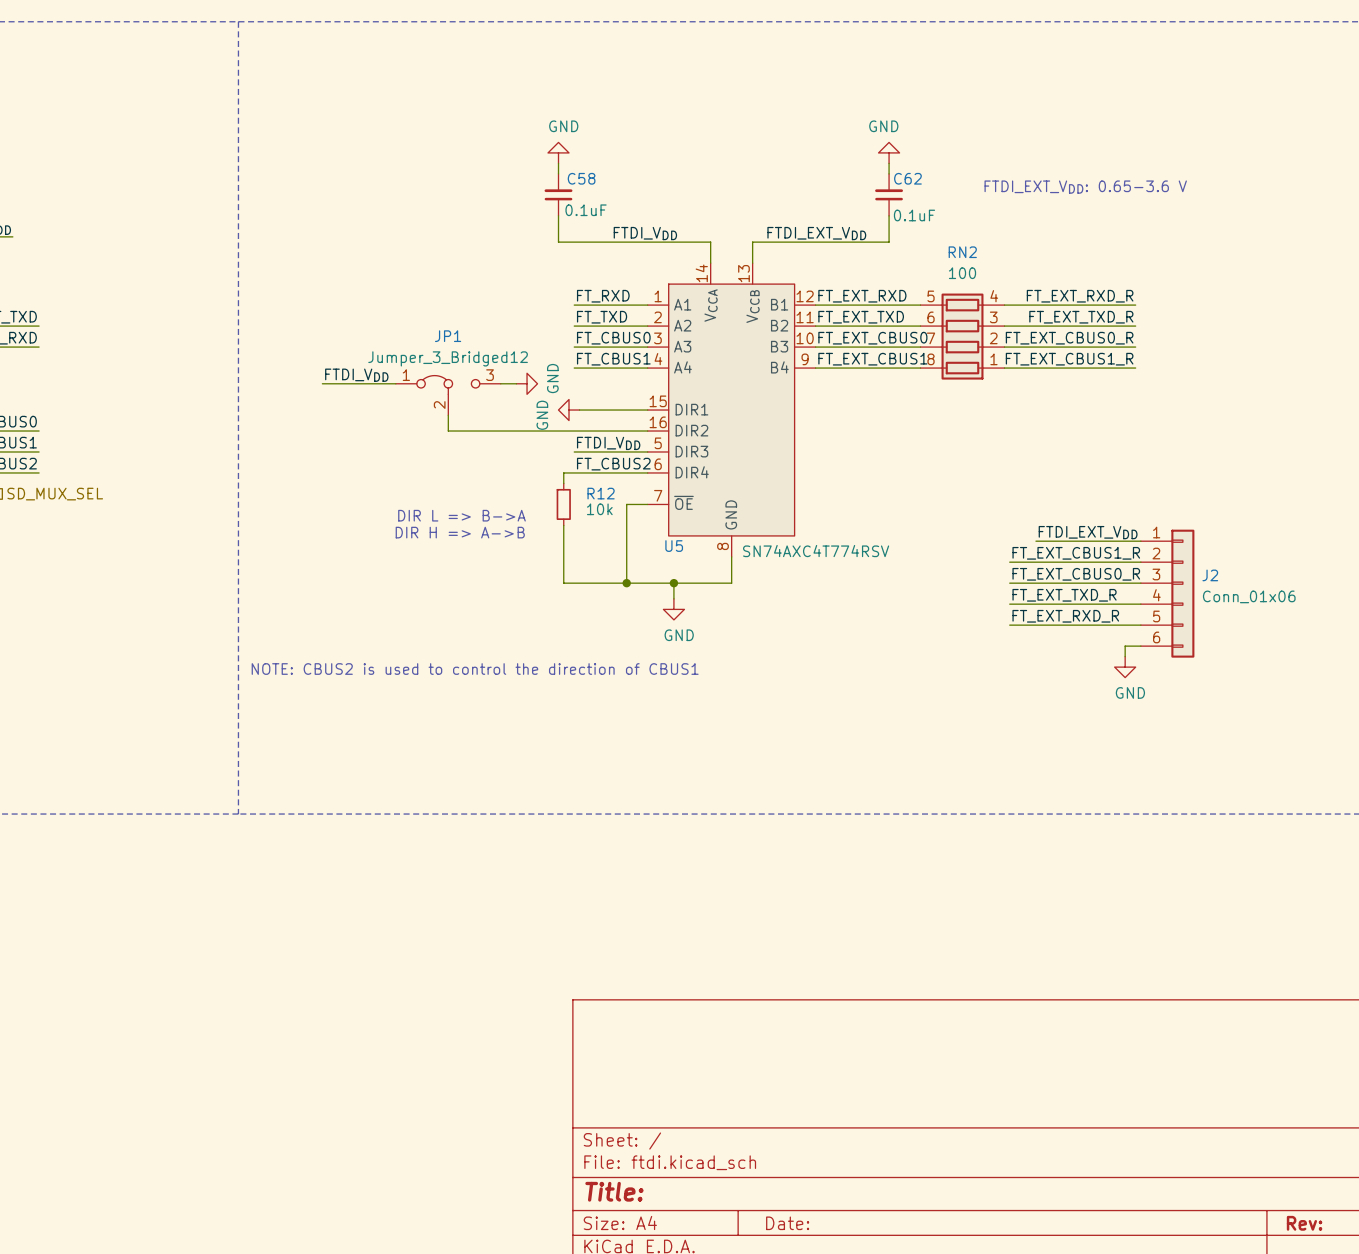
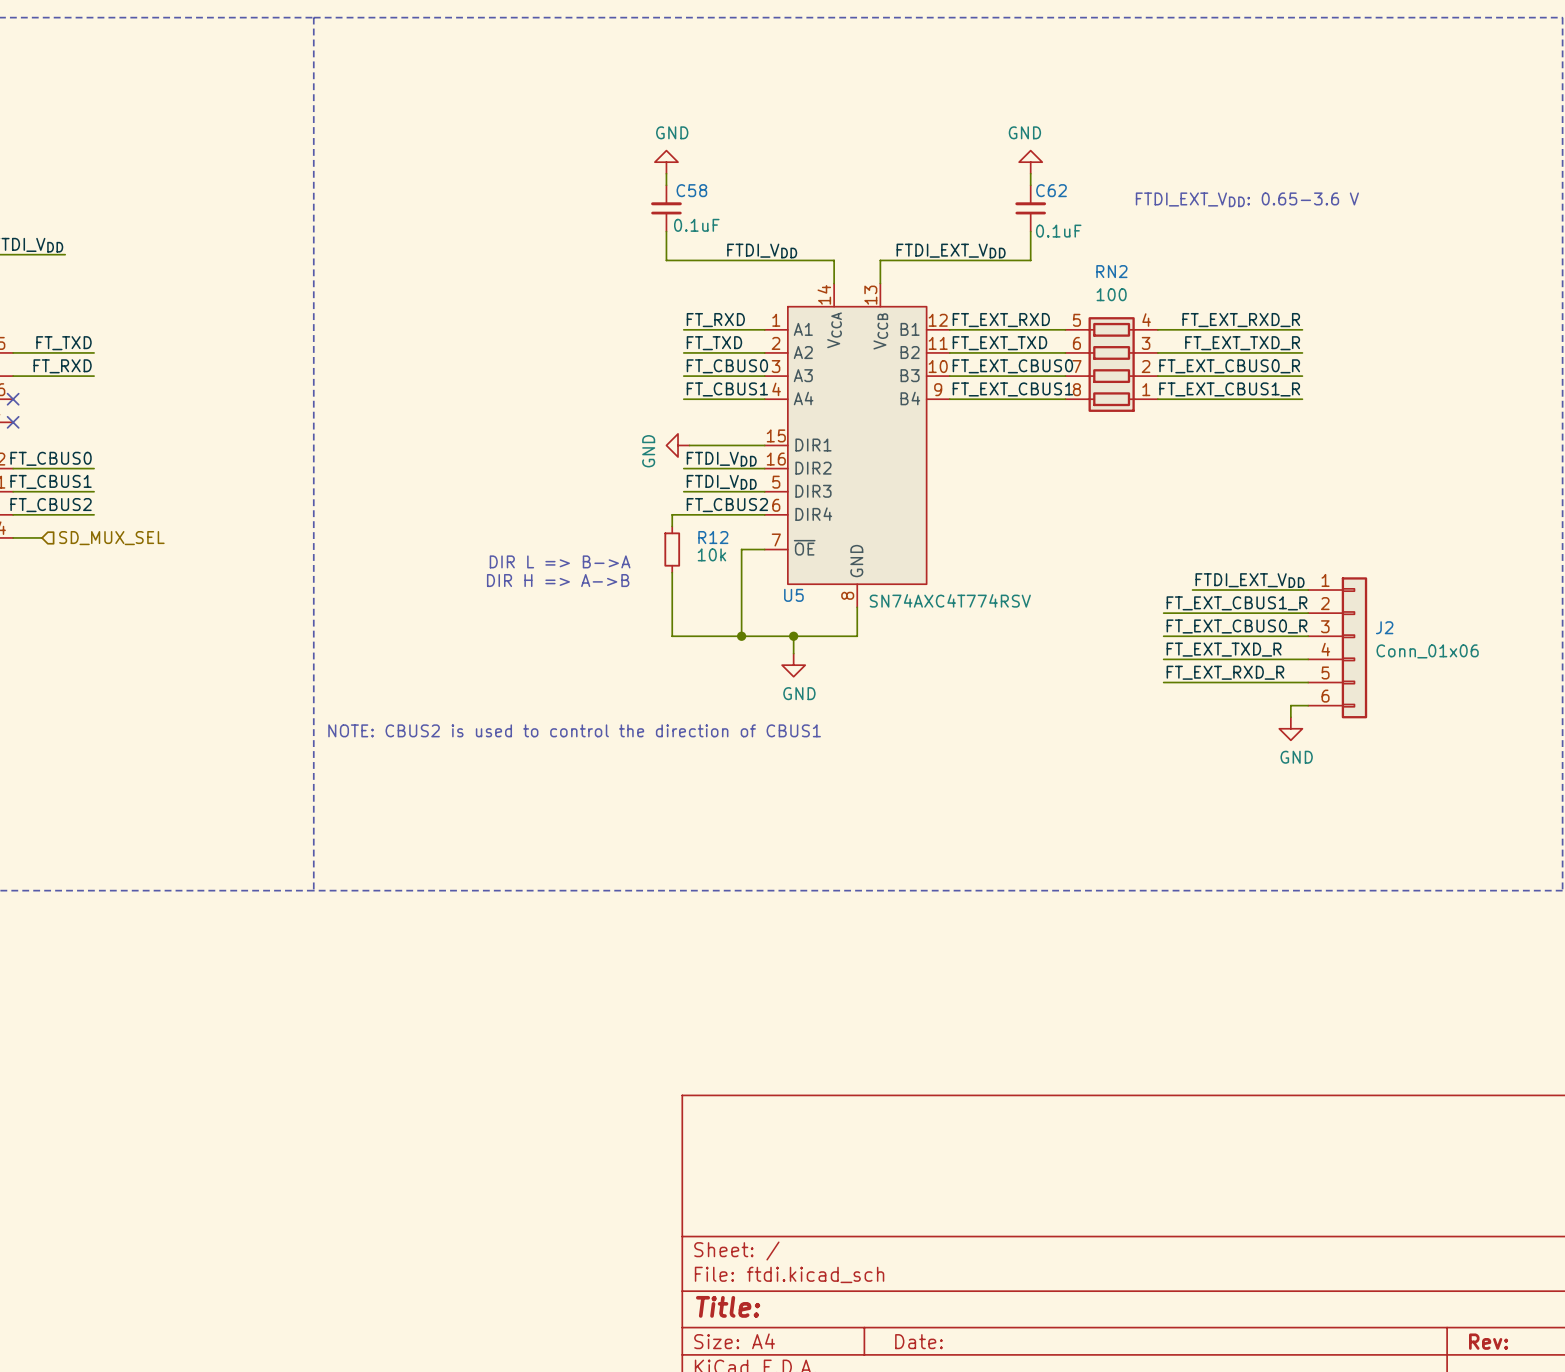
label: FTDI_VDD (356, 375) -> none
wire: (322, 383) (395, 383) -> none
wire: (500, 383) (516, 383) -> none
power symbol: GND (527, 383) -> none
JP1: Jumper_3_Bridged12 (448, 395) -> none
wire: (448, 415) (448, 431) (574, 431) -> none
label: none -> FTDI_VDD (721, 459)

